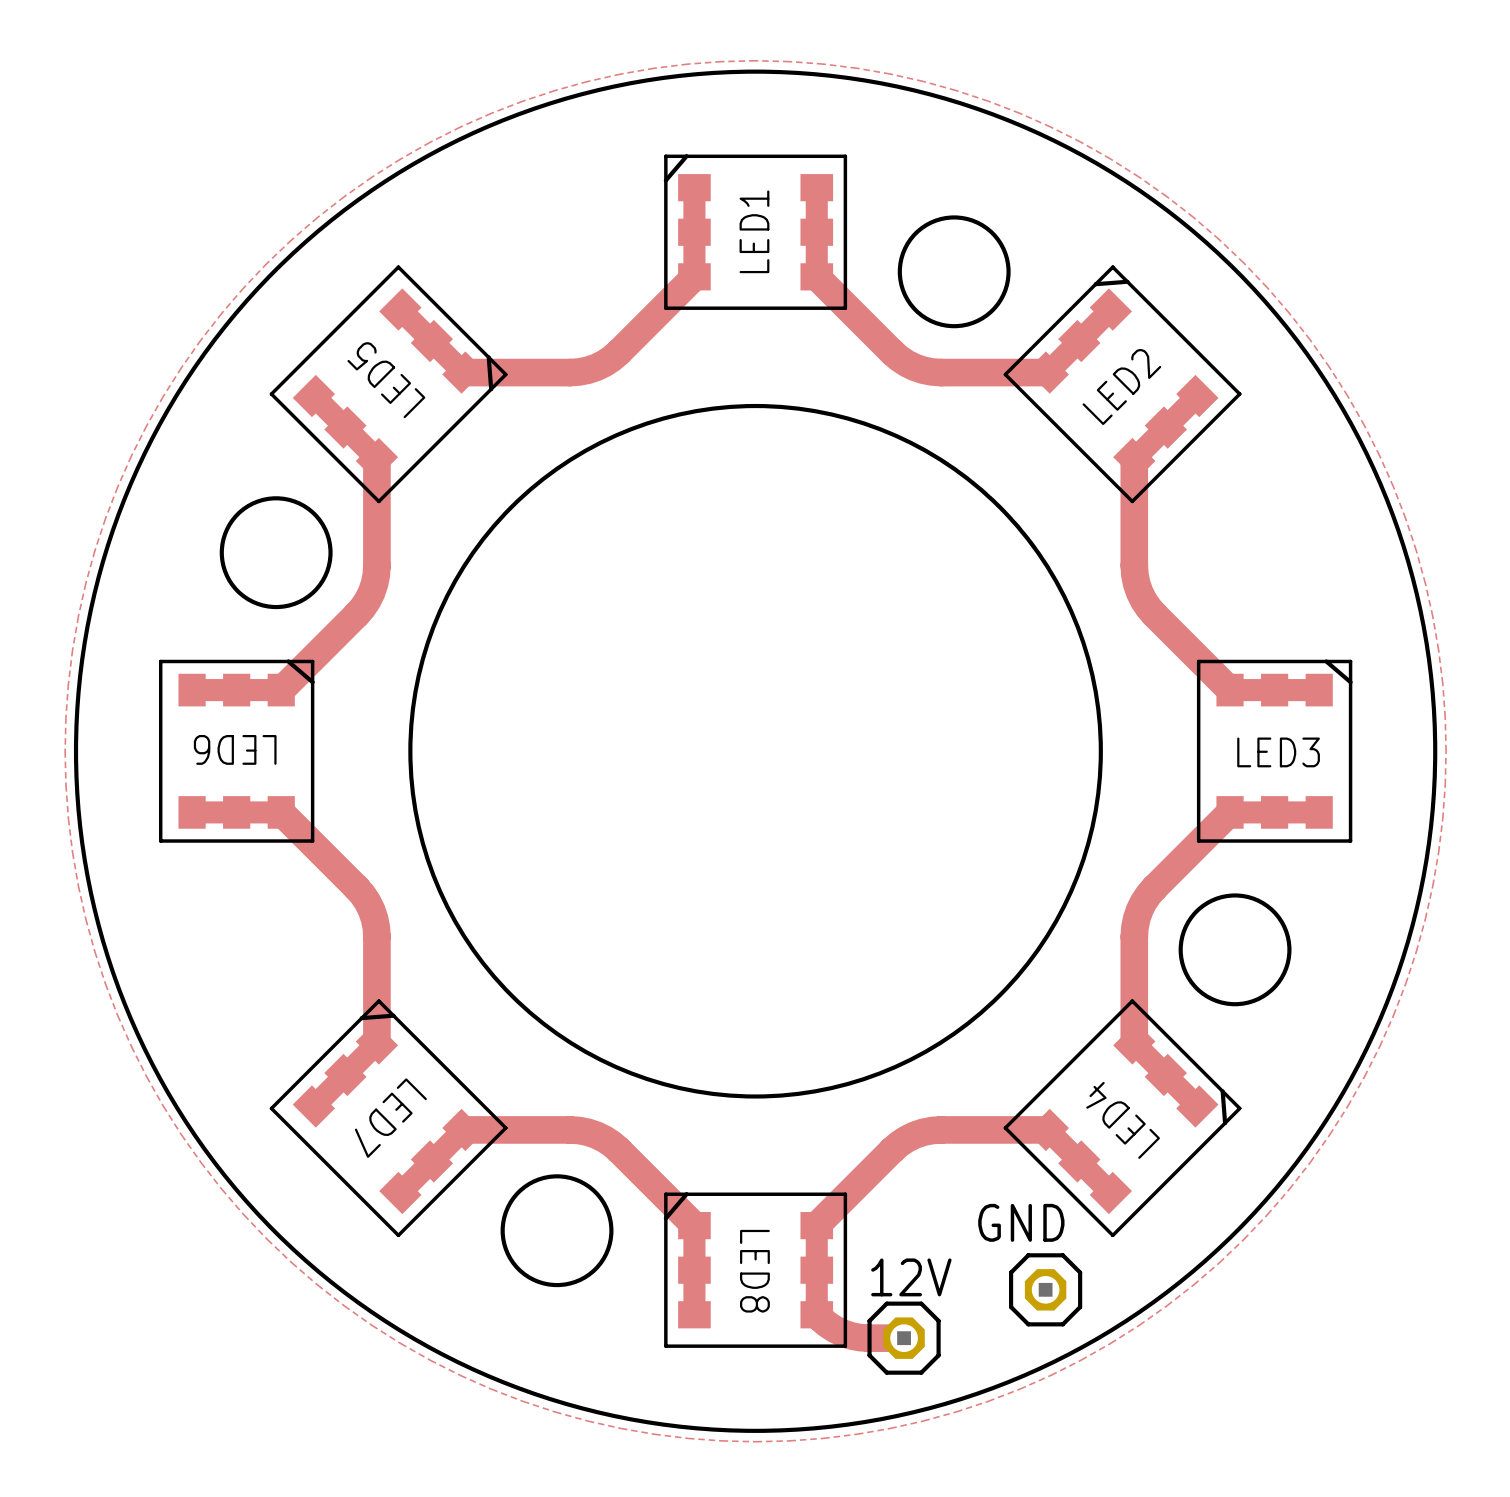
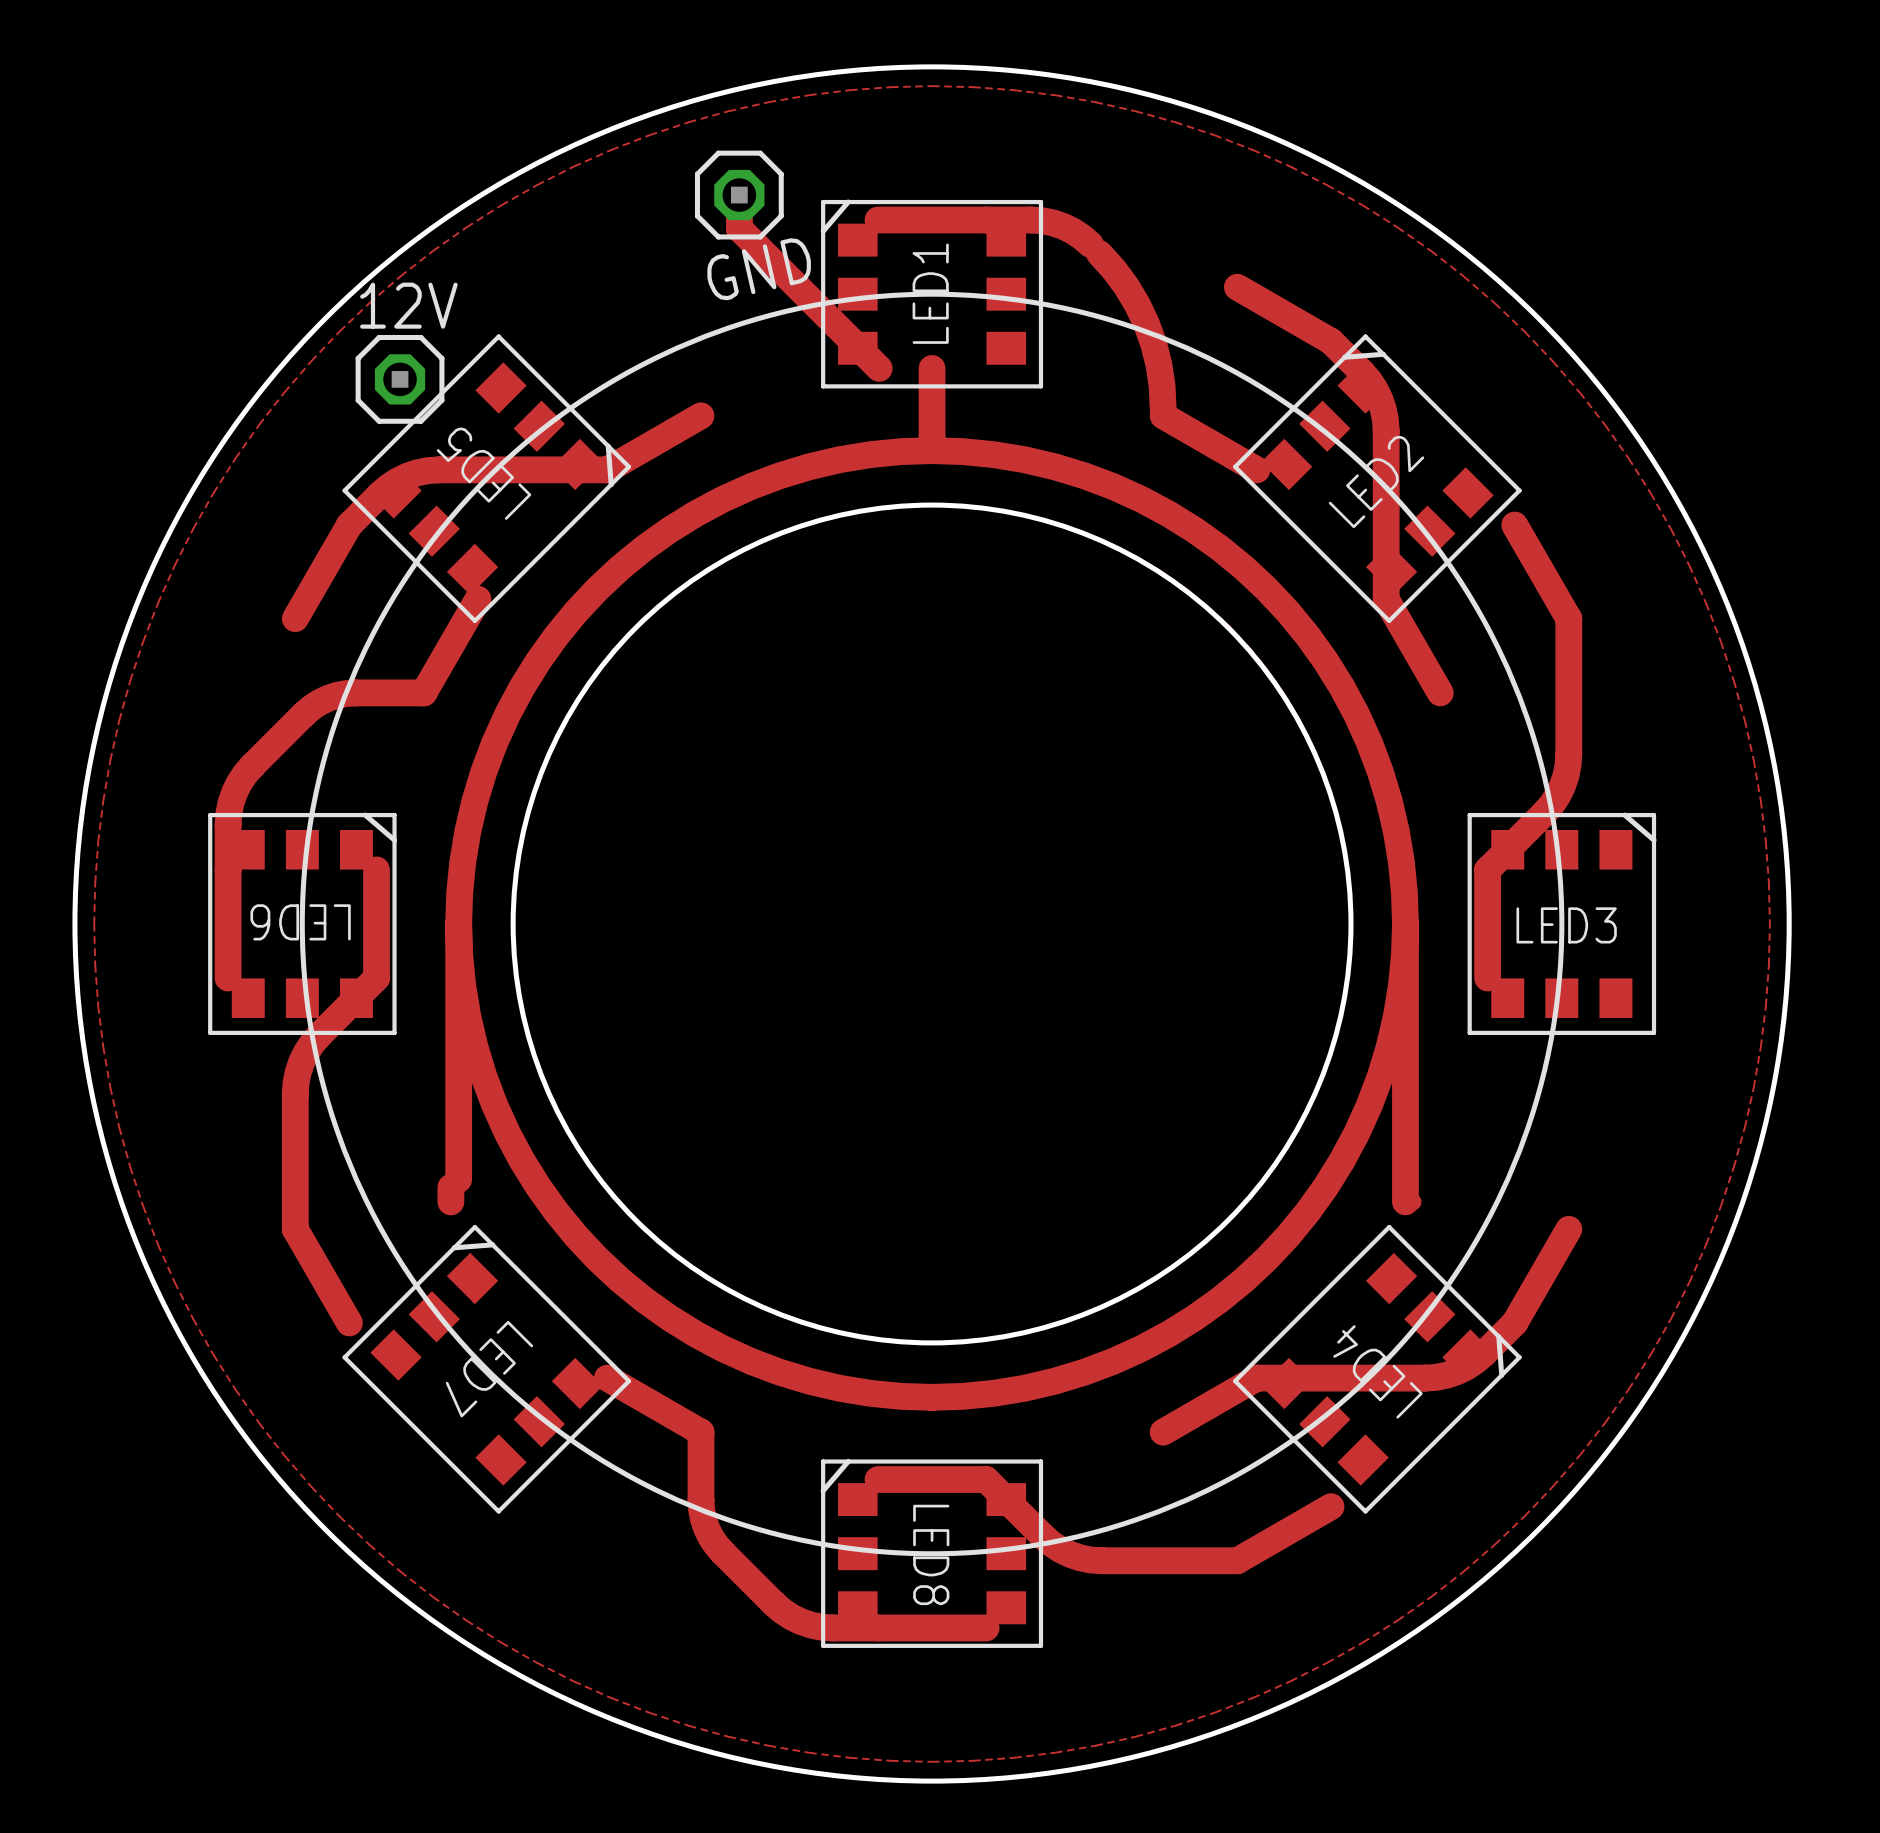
round board edge size: [73, 69, 1438, 1433] -> [72, 64, 1792, 1784]
track: none -> (739, 195) (739, 228) (879, 368)
GND: none -> (739, 195)
track: none -> (877, 219) (1031, 219) (1052, 222) (1073, 231) (1090, 244) (1113, 269) (1137, 304) (1146, 324) (1158, 364) (1163, 415) (1256, 469)
track: (694, 187) (694, 276) (618, 352) (596, 367) (570, 372) (463, 372) (400, 309) -> none
track: (816, 187) (816, 276) (892, 352) (914, 367) (941, 372) (1047, 372) (1110, 309) -> none
round board edge: [897, 215, 1011, 329] -> none
track: none -> (1237, 287) (1331, 341) (1361, 371) (1374, 389) (1383, 409) (1386, 431) (1386, 599) (1440, 692)
drawing: none -> [299, 291, 1565, 1557]
track: none -> (932, 368) (932, 450)
track: none -> (700, 415) (607, 469) (439, 469) (417, 472) (397, 481) (379, 494) (349, 525) (295, 618)
track: none -> (932, 450) (870, 454) (839, 459) (809, 466) (750, 486) (722, 499) (669, 530) (643, 548) (597, 589) (556, 635) (538, 660) (522, 687) (494, 742) (483, 771) (467, 831) (462, 862) (458, 923)
track: none -> (932, 450) (993, 454) (1024, 459) (1084, 475) (1113, 486) (1168, 514) (1195, 530) (1220, 548) (1266, 589) (1307, 635) (1325, 660) (1356, 714) (1369, 742) (1389, 801) (1396, 831) (1401, 862) (1405, 923)
track: (313, 396) (376, 459) (376, 565) (371, 592) (356, 614) (281, 690) (192, 690) -> none
track: (1197, 396) (1134, 459) (1134, 565) (1139, 592) (1154, 614) (1230, 690) (1319, 690) -> none
track: none -> (1514, 525) (1568, 618) (1568, 753) (1562, 786) (1551, 804) (1487, 869) (1487, 978)
track: none -> (477, 599) (423, 692) (355, 692) (327, 698) (303, 714) (252, 765) (239, 782) (230, 803) (228, 824) (228, 978)
round board edge: [219, 496, 333, 610] -> none
track: none -> (376, 869) (376, 978) (312, 1042) (301, 1061) (295, 1093) (295, 1229) (349, 1322)
track: none -> (458, 924) (458, 1179) (450, 1187) (450, 1201)
track: none -> (458, 924) (462, 985) (467, 1016) (474, 1046) (494, 1105) (507, 1133) (538, 1186) (556, 1212) (597, 1258) (643, 1299) (669, 1317) (695, 1333) (750, 1361) (779, 1372) (839, 1388) (870, 1393) (932, 1397) (963, 1396) (1024, 1388) (1054, 1381) (1113, 1361) (1141, 1348) (1195, 1317) (1220, 1299) (1266, 1258) (1307, 1212) (1325, 1186) (1342, 1160) (1369, 1105) (1380, 1076) (1396, 1016) (1401, 985) (1405, 924)
track: none -> (1405, 924) (1405, 1201) (1413, 1201)
track: (192, 812) (281, 812) (356, 887) (371, 910) (376, 936) (376, 1043) (313, 1106) -> none
track: (1319, 812) (1230, 812) (1154, 887) (1139, 910) (1134, 936) (1134, 1043) (1197, 1106) -> none
round board edge: [1178, 893, 1292, 1007] -> none
track: none -> (1568, 1229) (1514, 1322) (1484, 1353) (1466, 1366) (1446, 1375) (1424, 1378) (1256, 1378) (1163, 1432)
track: none -> (607, 1378) (700, 1432) (700, 1500) (706, 1528) (722, 1552) (773, 1603) (791, 1616) (811, 1625) (832, 1627) (986, 1627)
round board edge: [500, 1174, 614, 1288] -> none
track: (400, 1192) (463, 1129) (570, 1129) (596, 1135) (618, 1150) (694, 1225) (694, 1314) -> none
track: (1110, 1192) (1047, 1129) (932, 1130) (914, 1135) (899, 1144) (816, 1225) (816, 1314) (834, 1328) (850, 1335) (868, 1338) (904, 1338) -> none
track: none -> (877, 1479) (986, 1479) (1051, 1543) (1070, 1554) (1102, 1560) (1237, 1560) (1331, 1506)
GND: (1045, 1289) -> none
12V position: (904, 1338) -> (400, 379)

